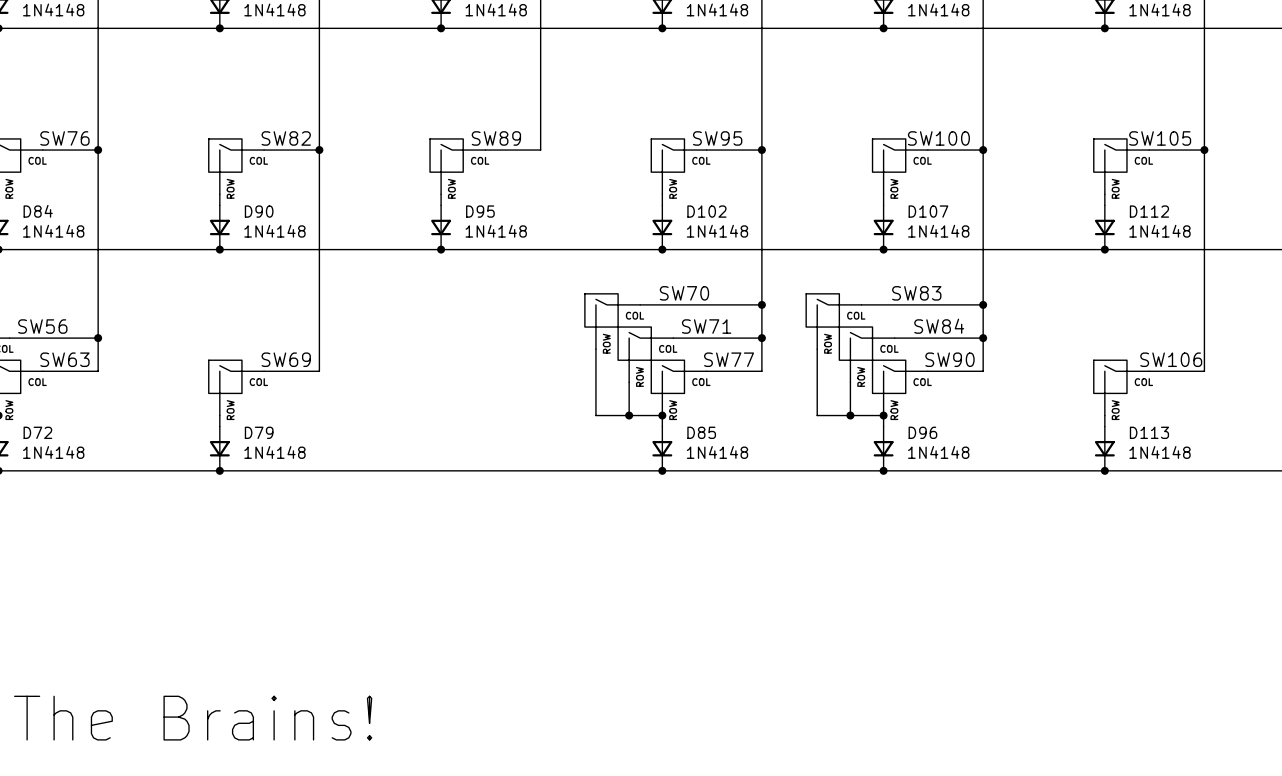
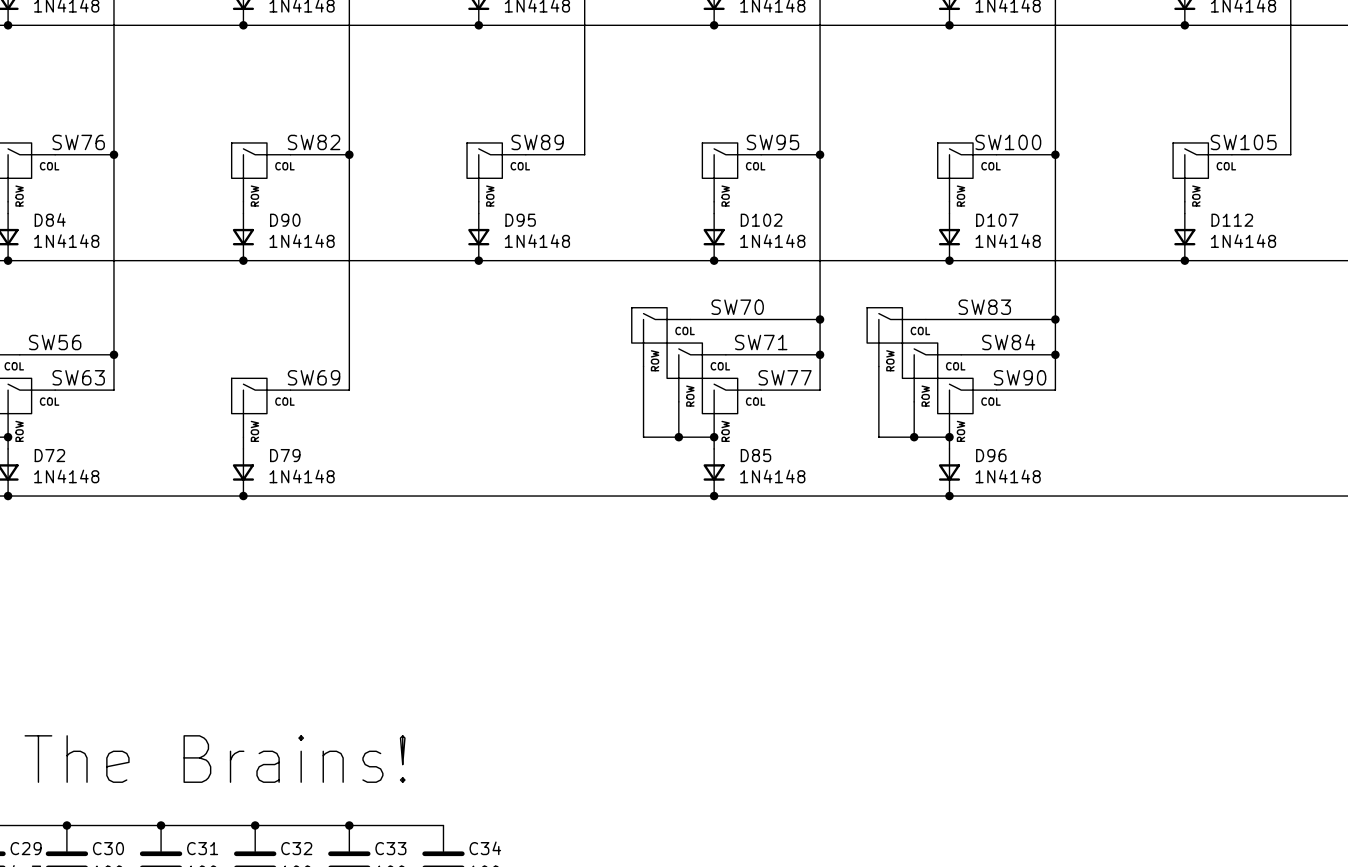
wire: (1204, 150) (1204, 371) (1149, 371) -> none
junction: (1204, 150) -> none
SW106: (1121, 387) -> none
wire: (1104, 415) (1104, 426) -> none
D113: 1N4148 (1104, 448) -> none
junction: (1104, 470) -> none

